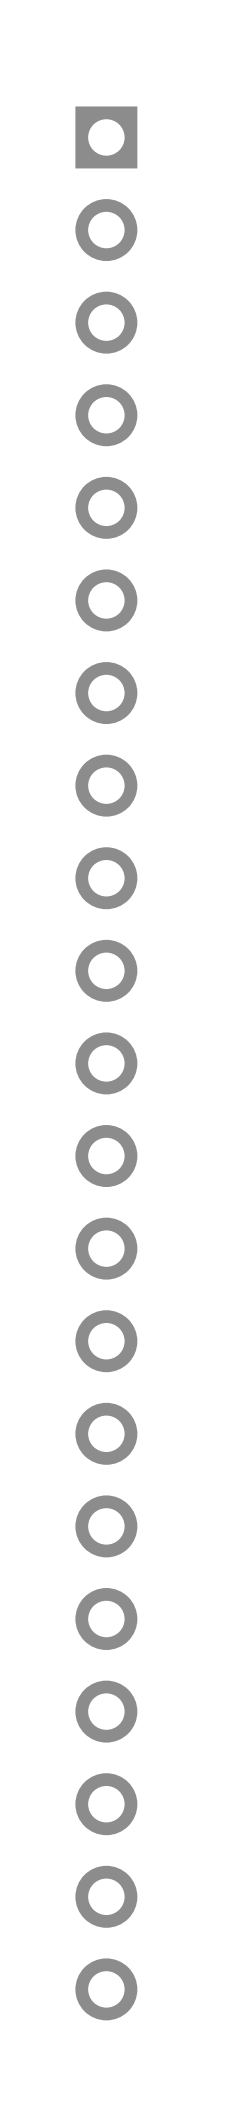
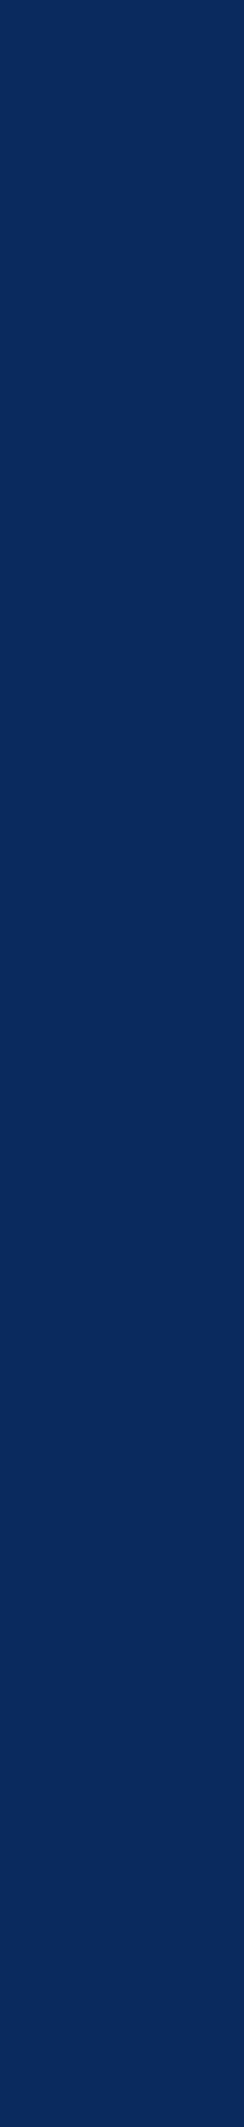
part: (106, 1063) -> none

